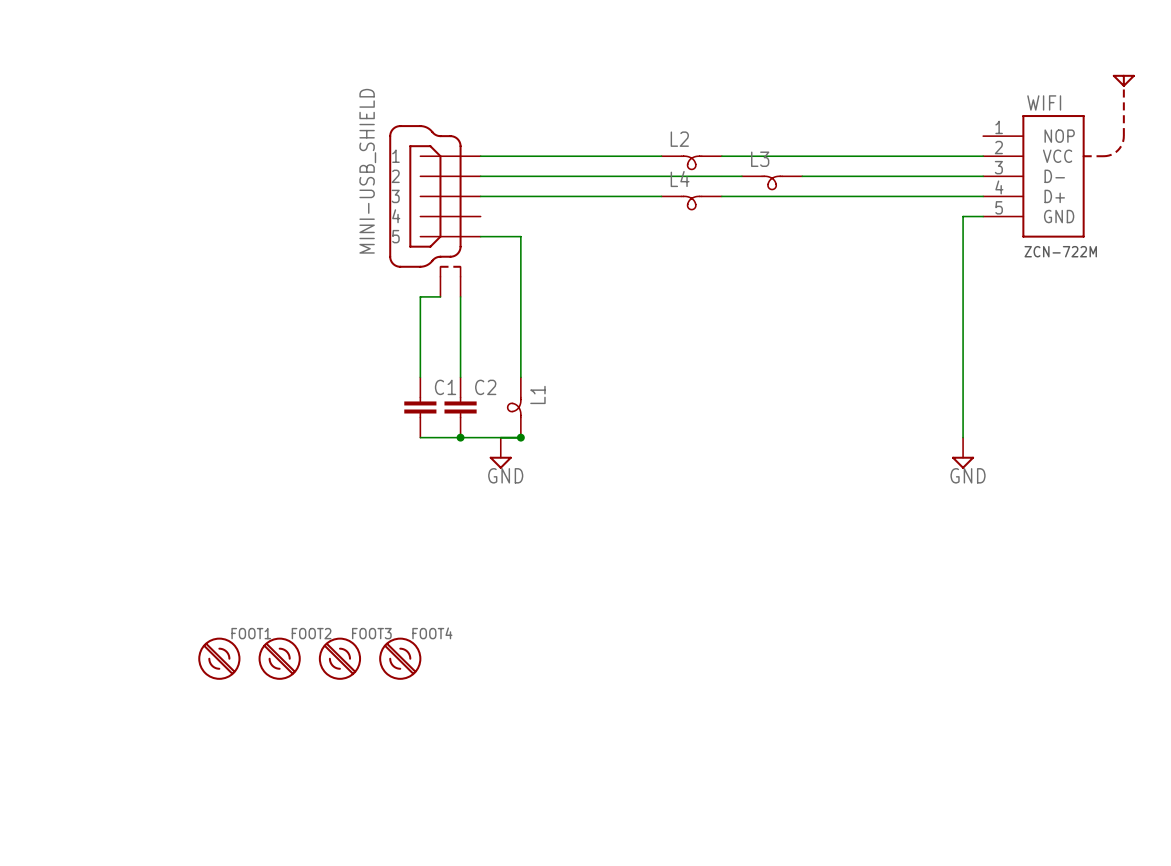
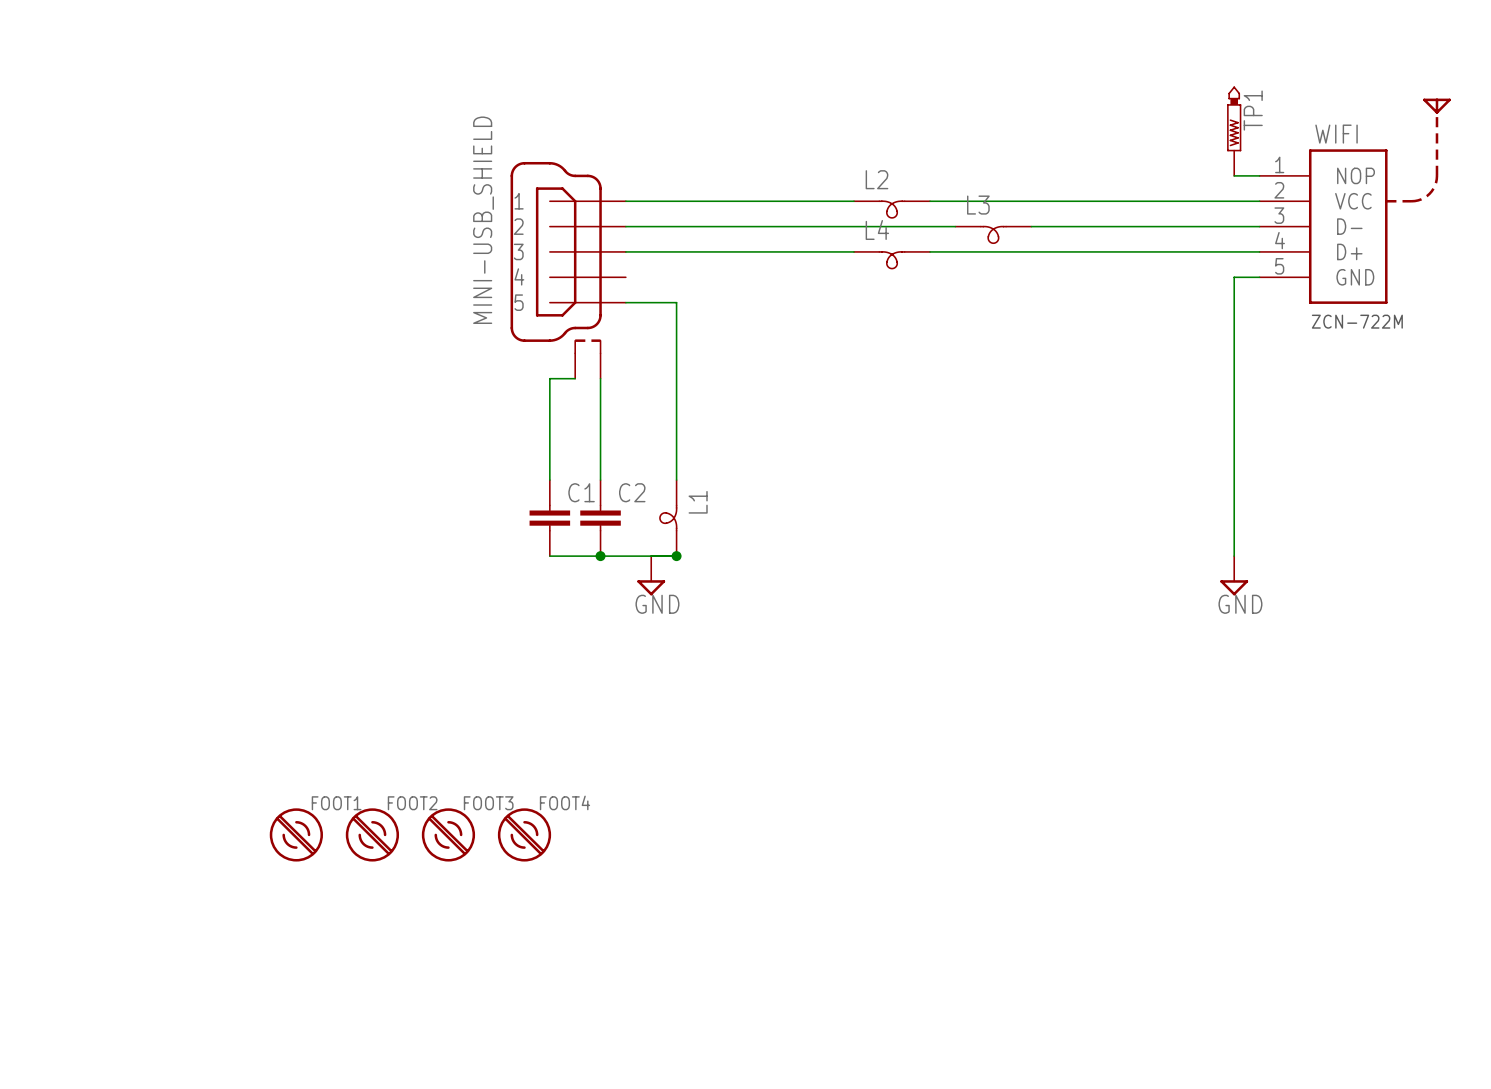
TP1: none -> (1234, 131)
wire: none -> (1234, 175) (1259, 175)

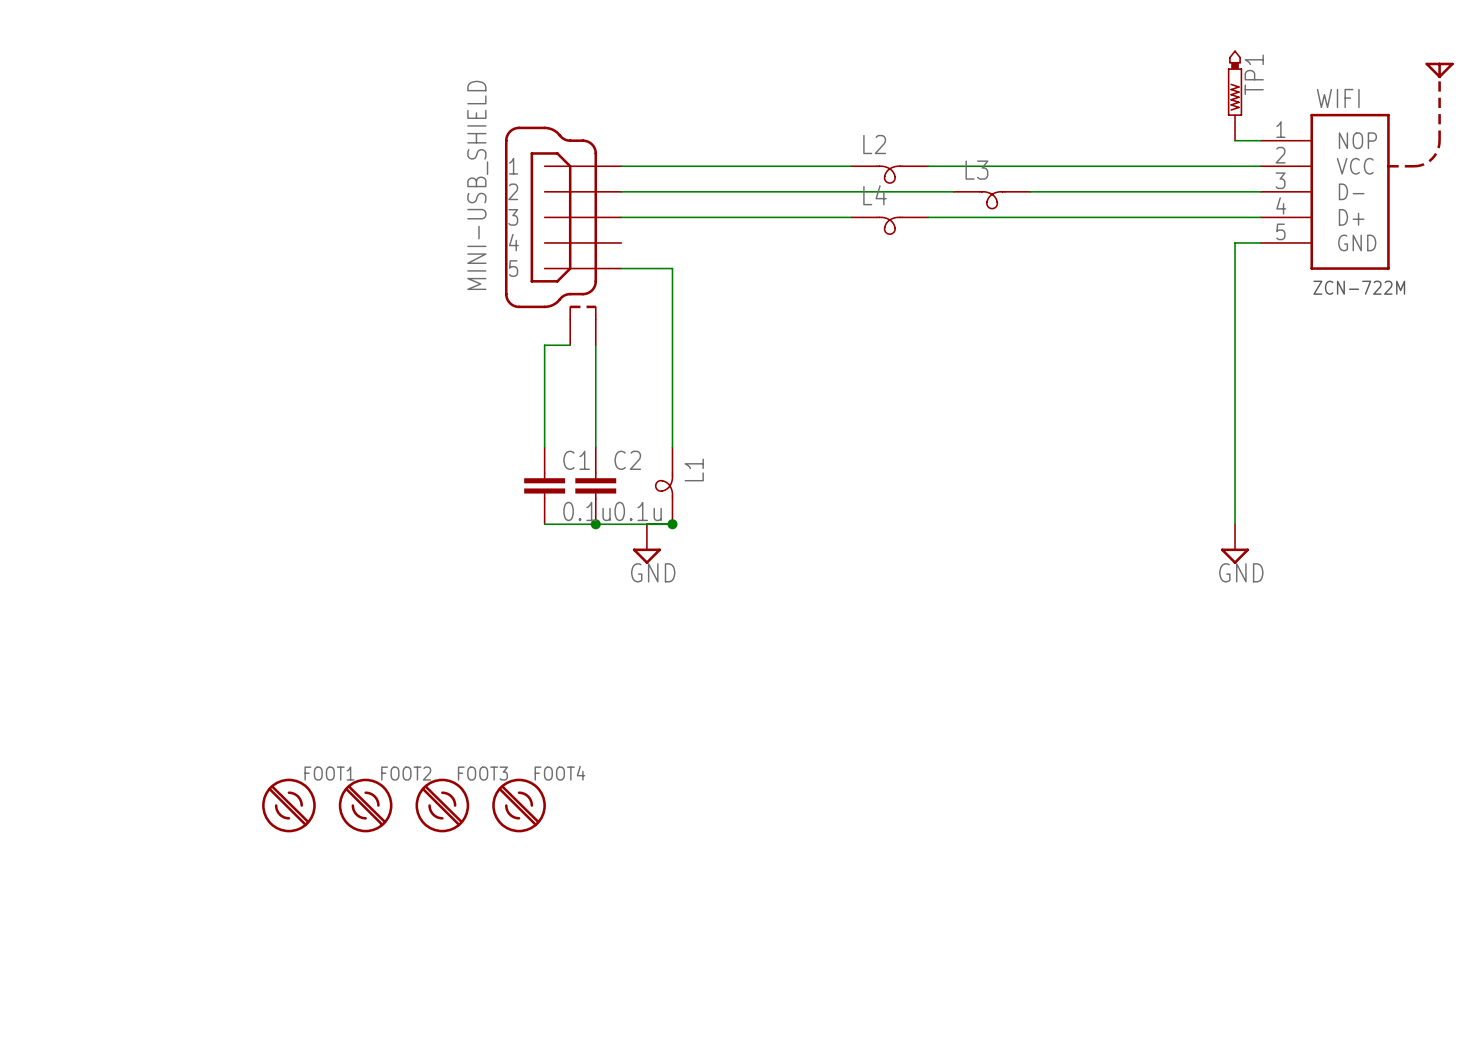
C1 value: none -> 0.1u (586, 511)
C2 value: none -> 0.1u (638, 511)

